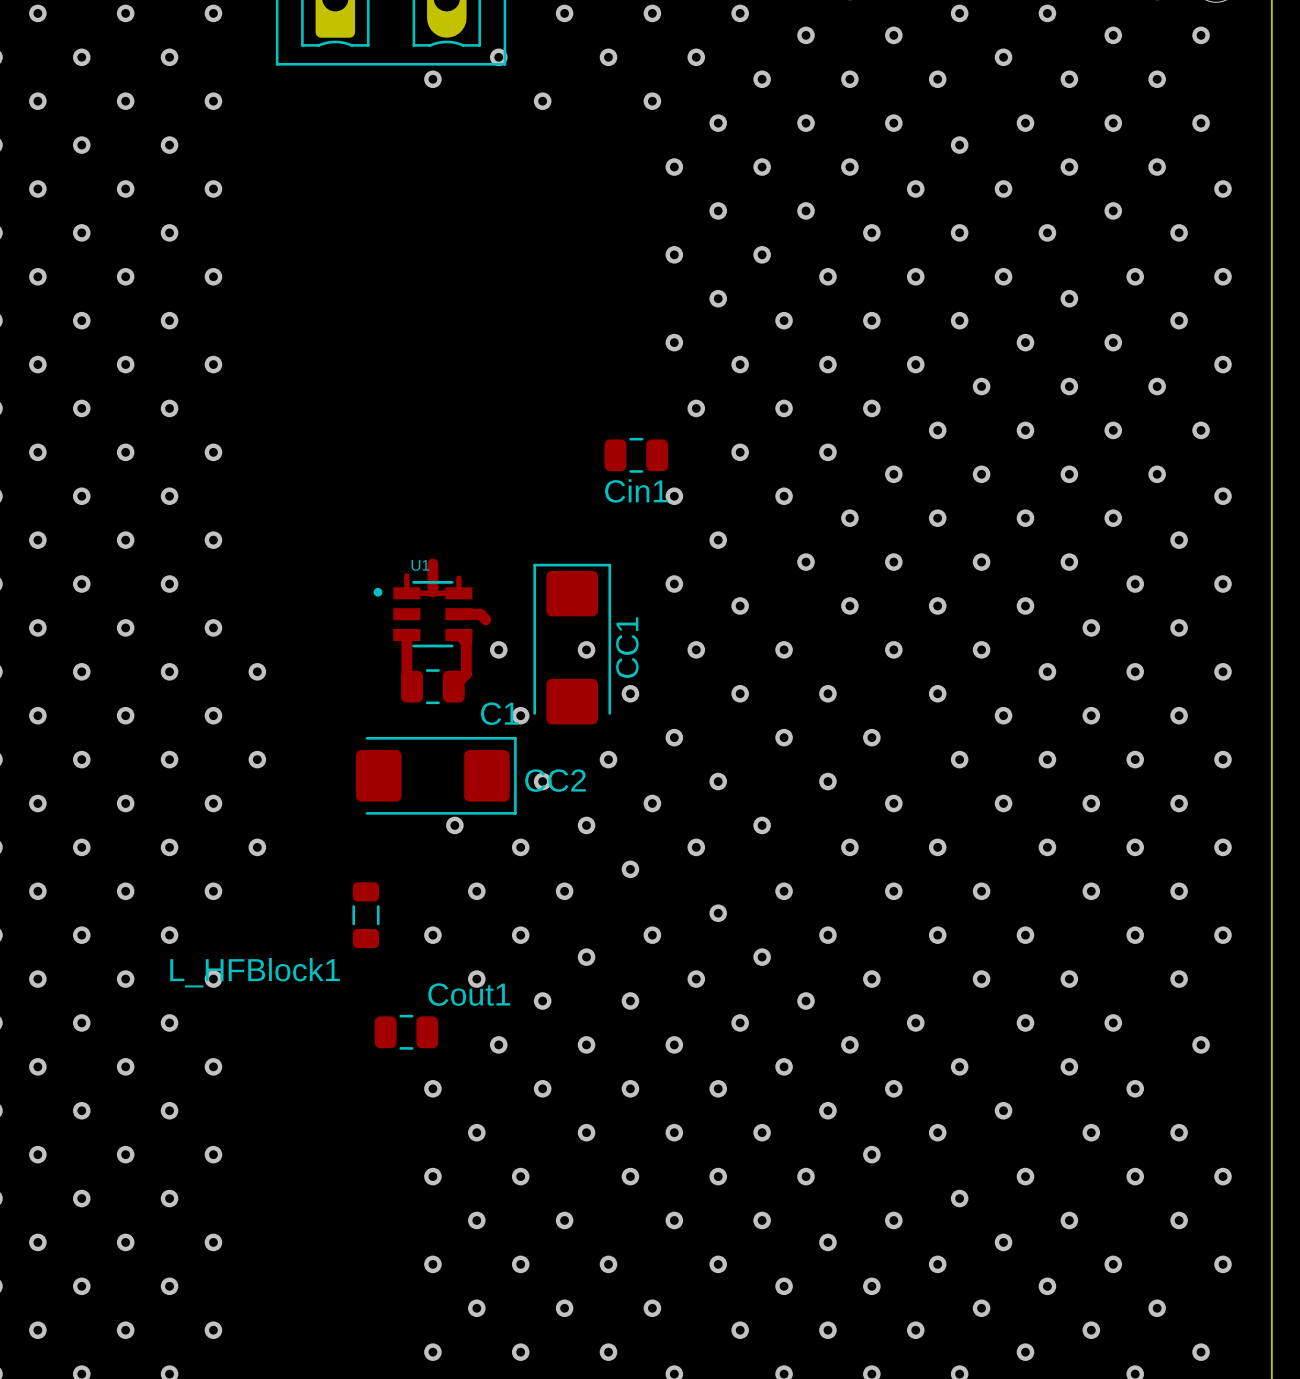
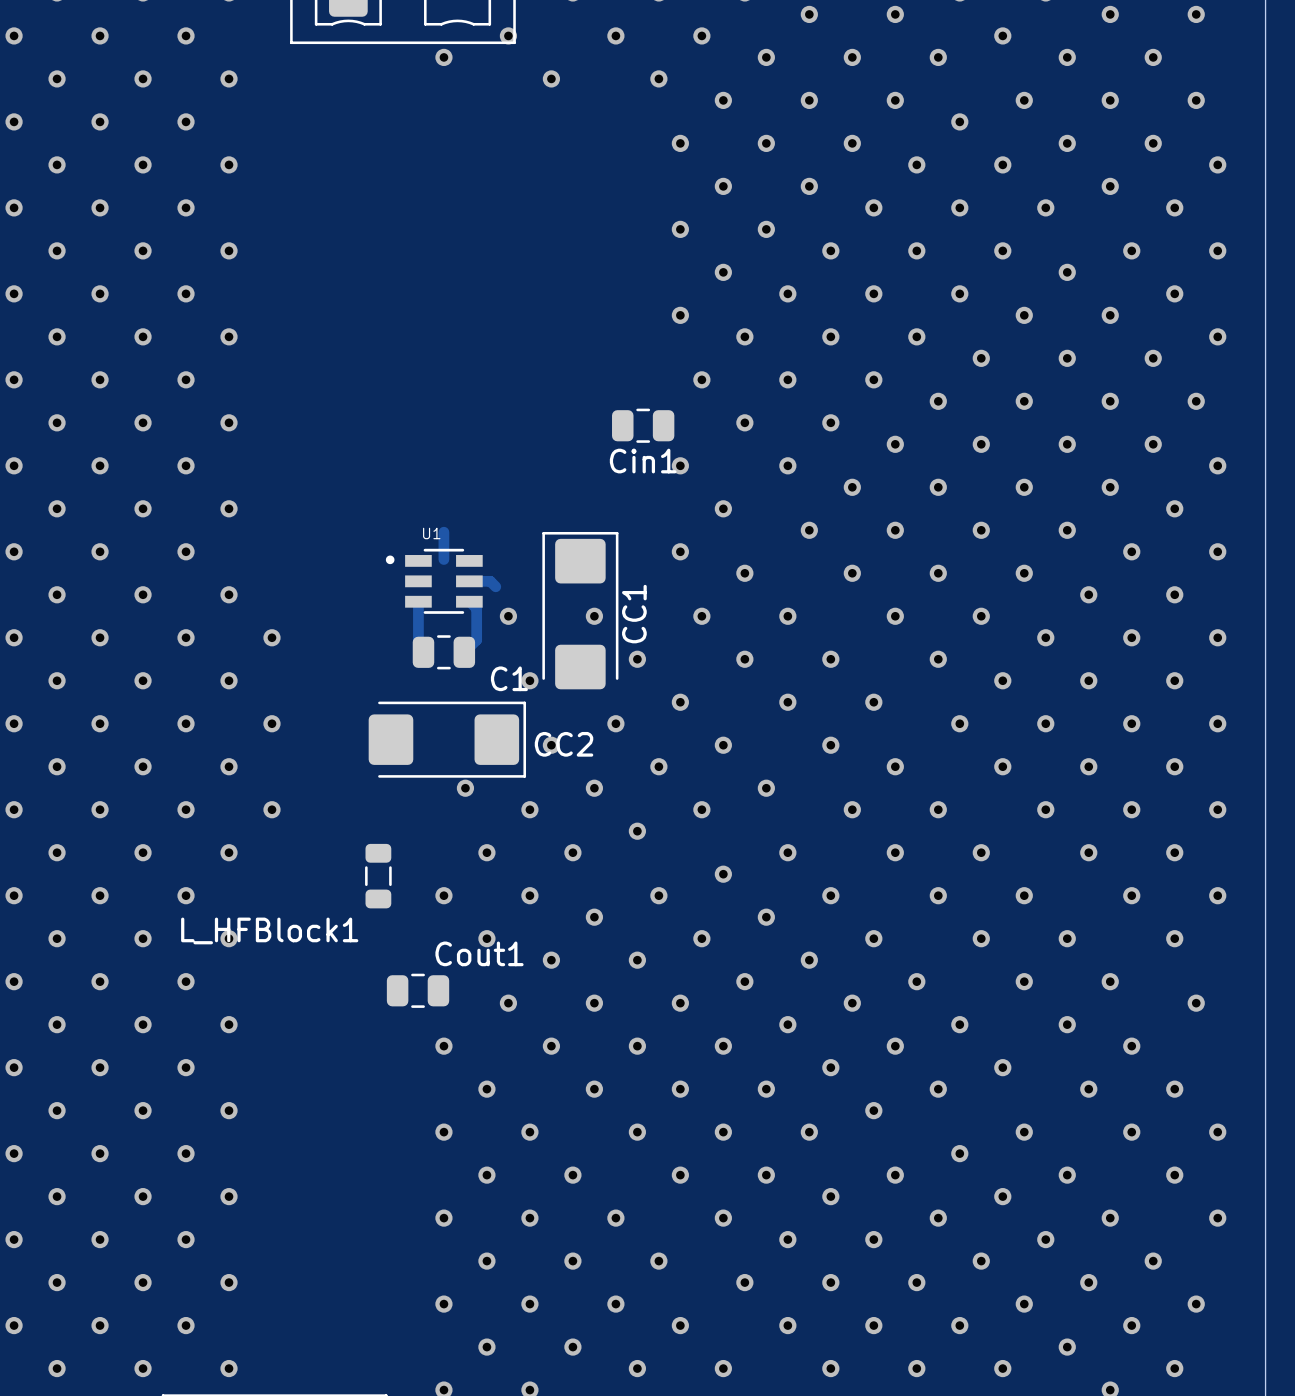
track: (406, 575) (406, 593) -> none
track: (458, 578) (458, 593) (406, 593) -> none

